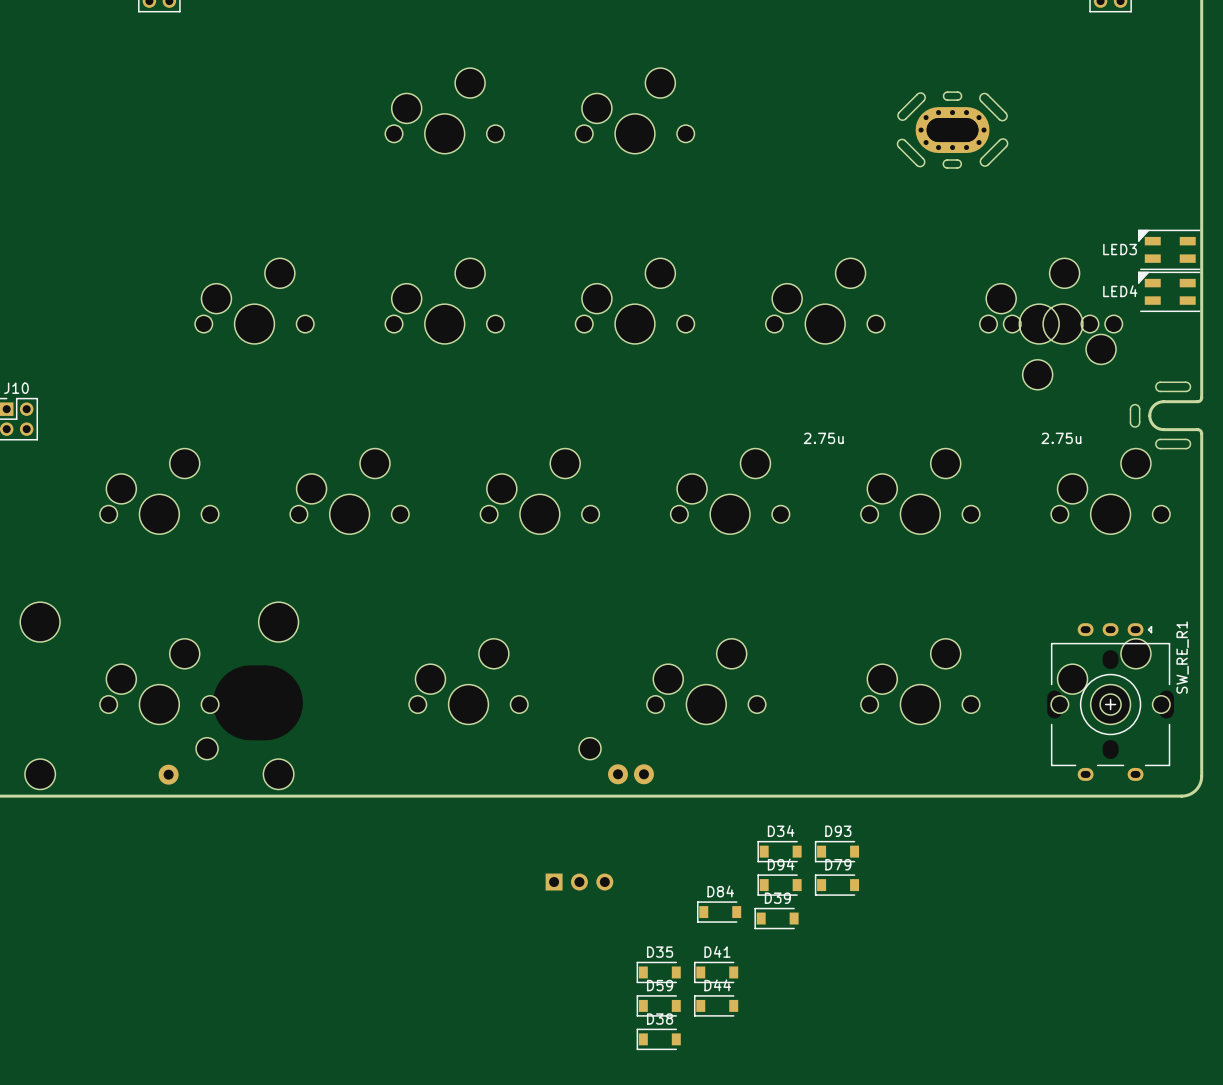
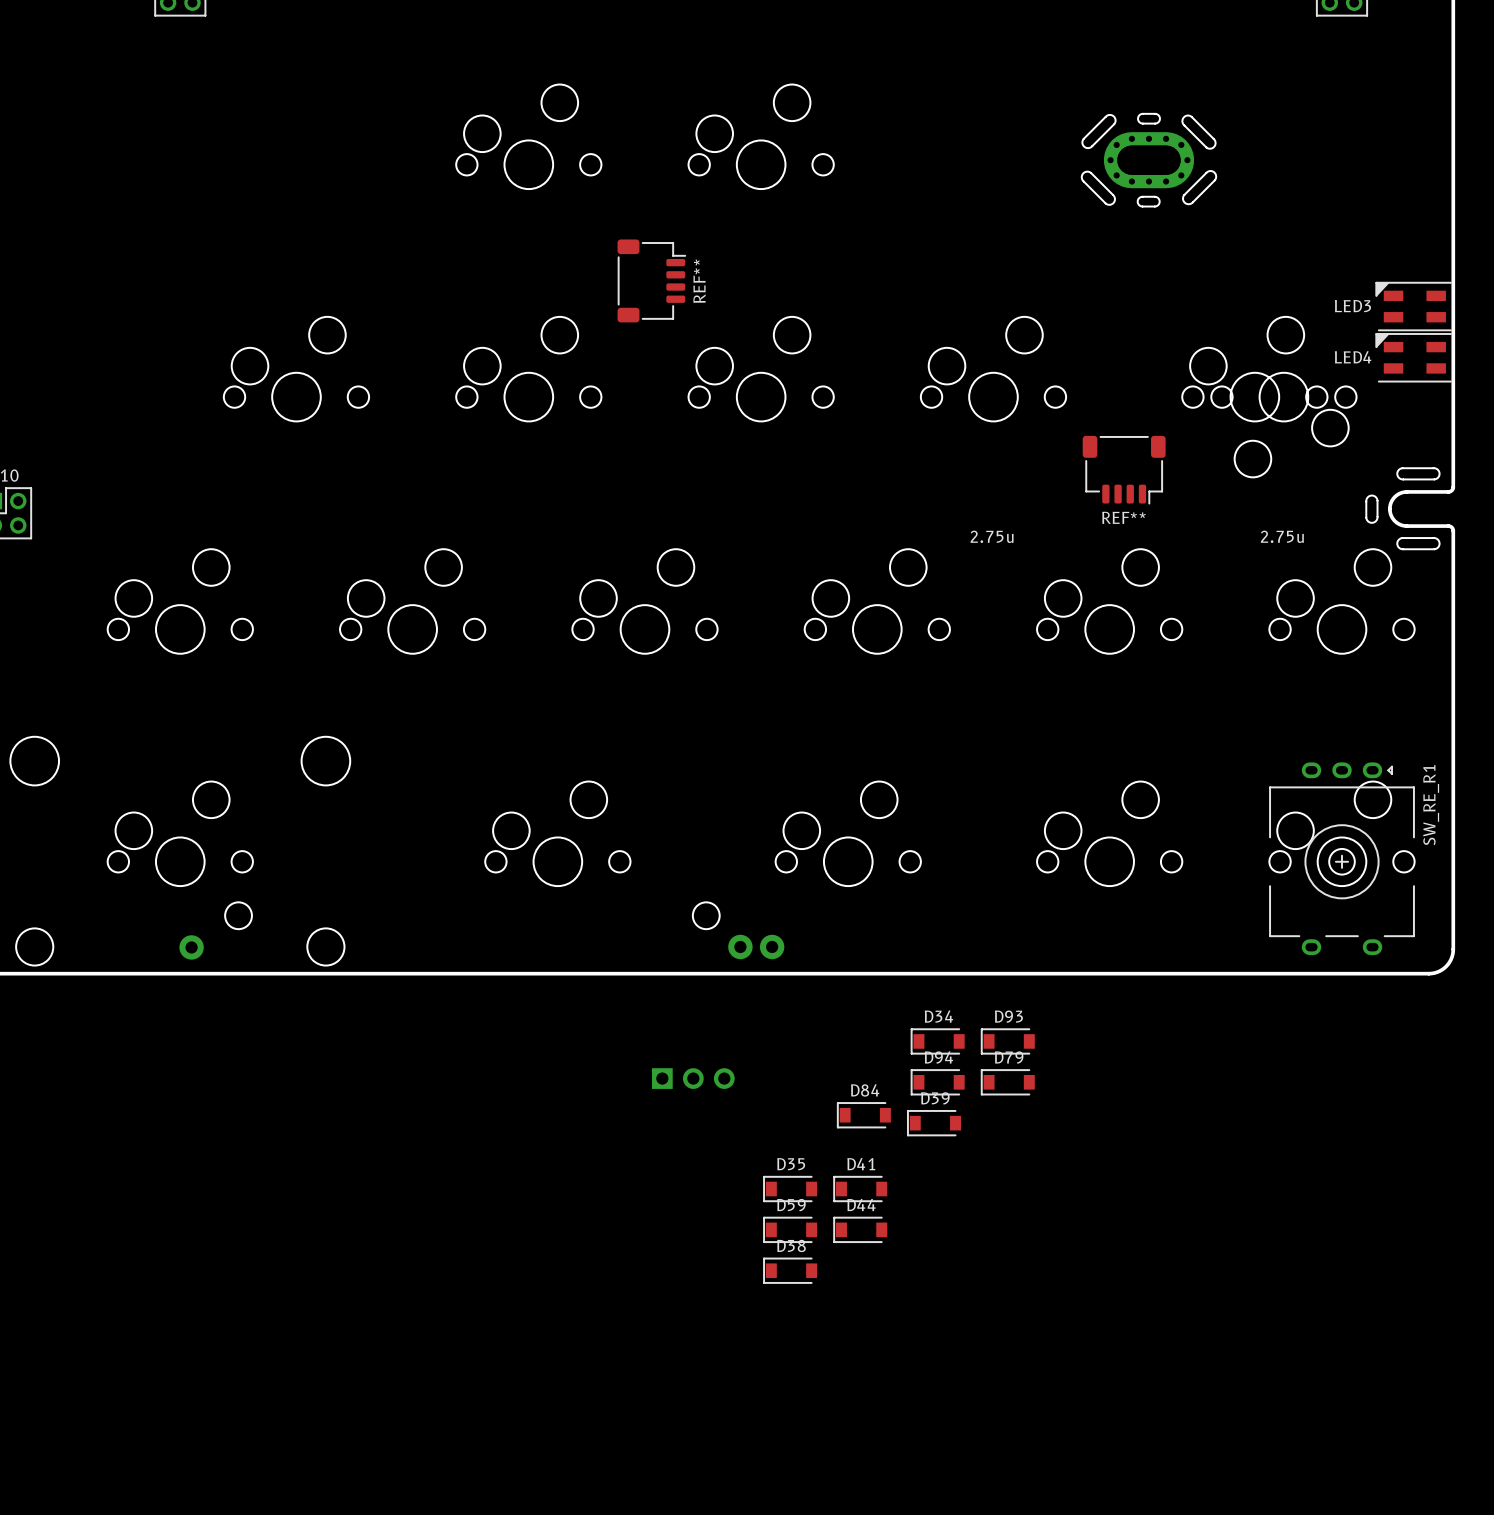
REF**: none -> (651, 280)
REF**: none -> (1124, 470)

